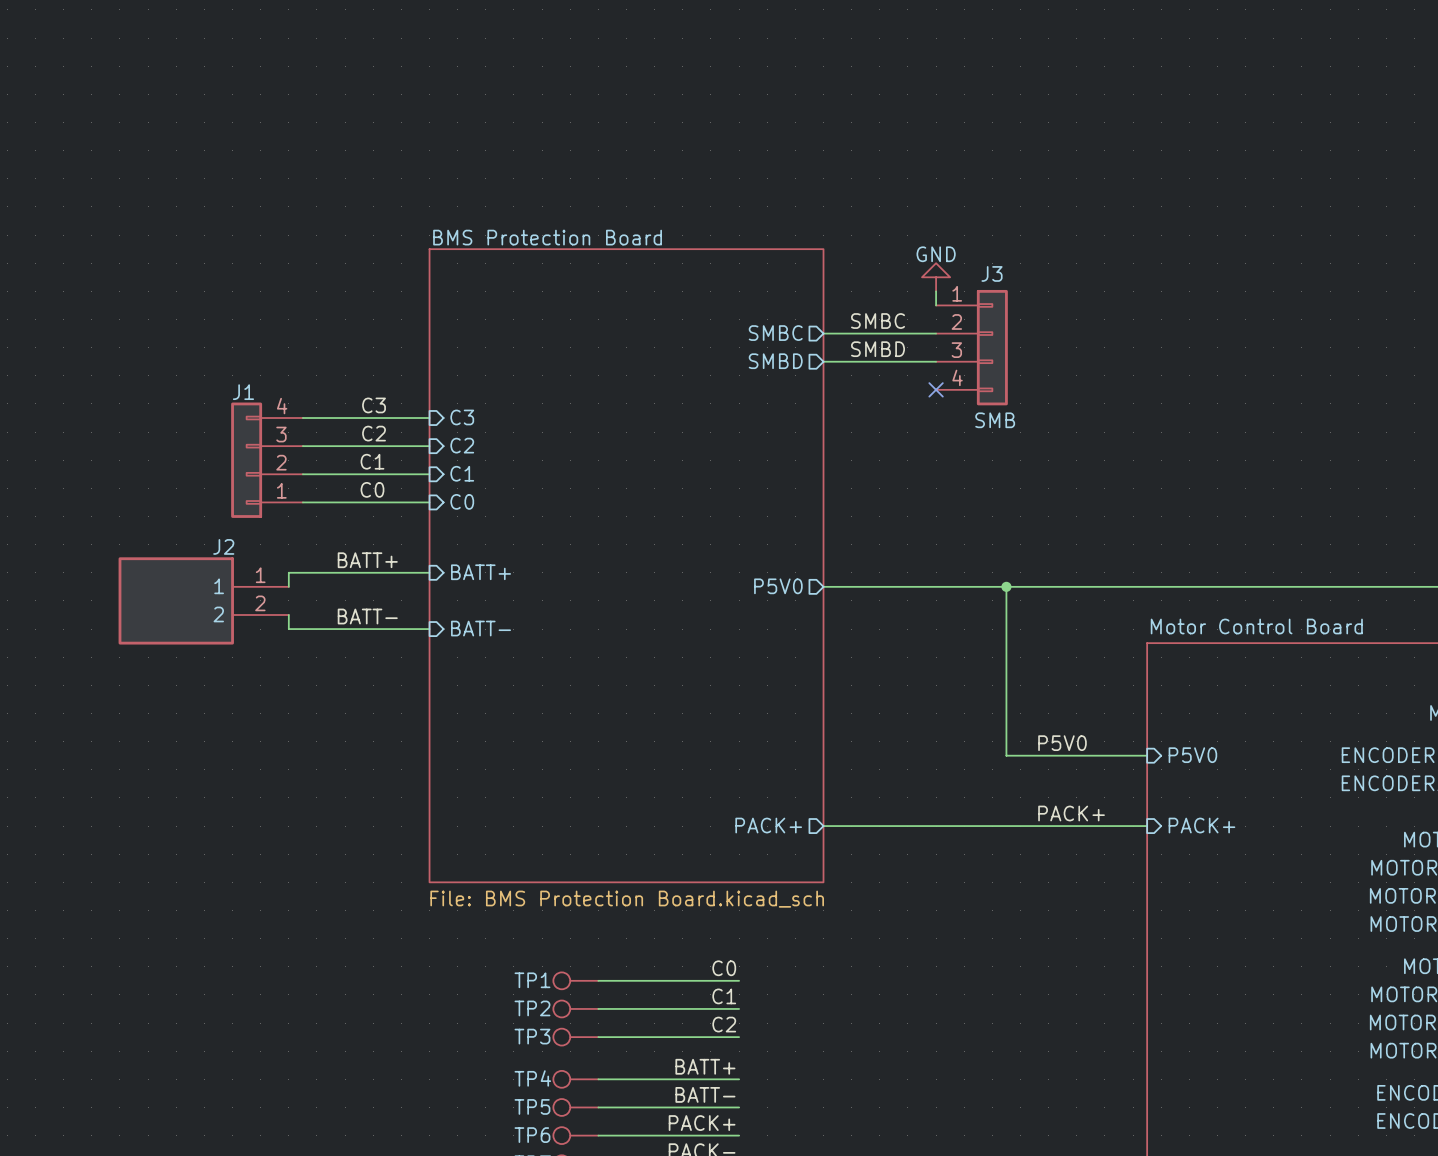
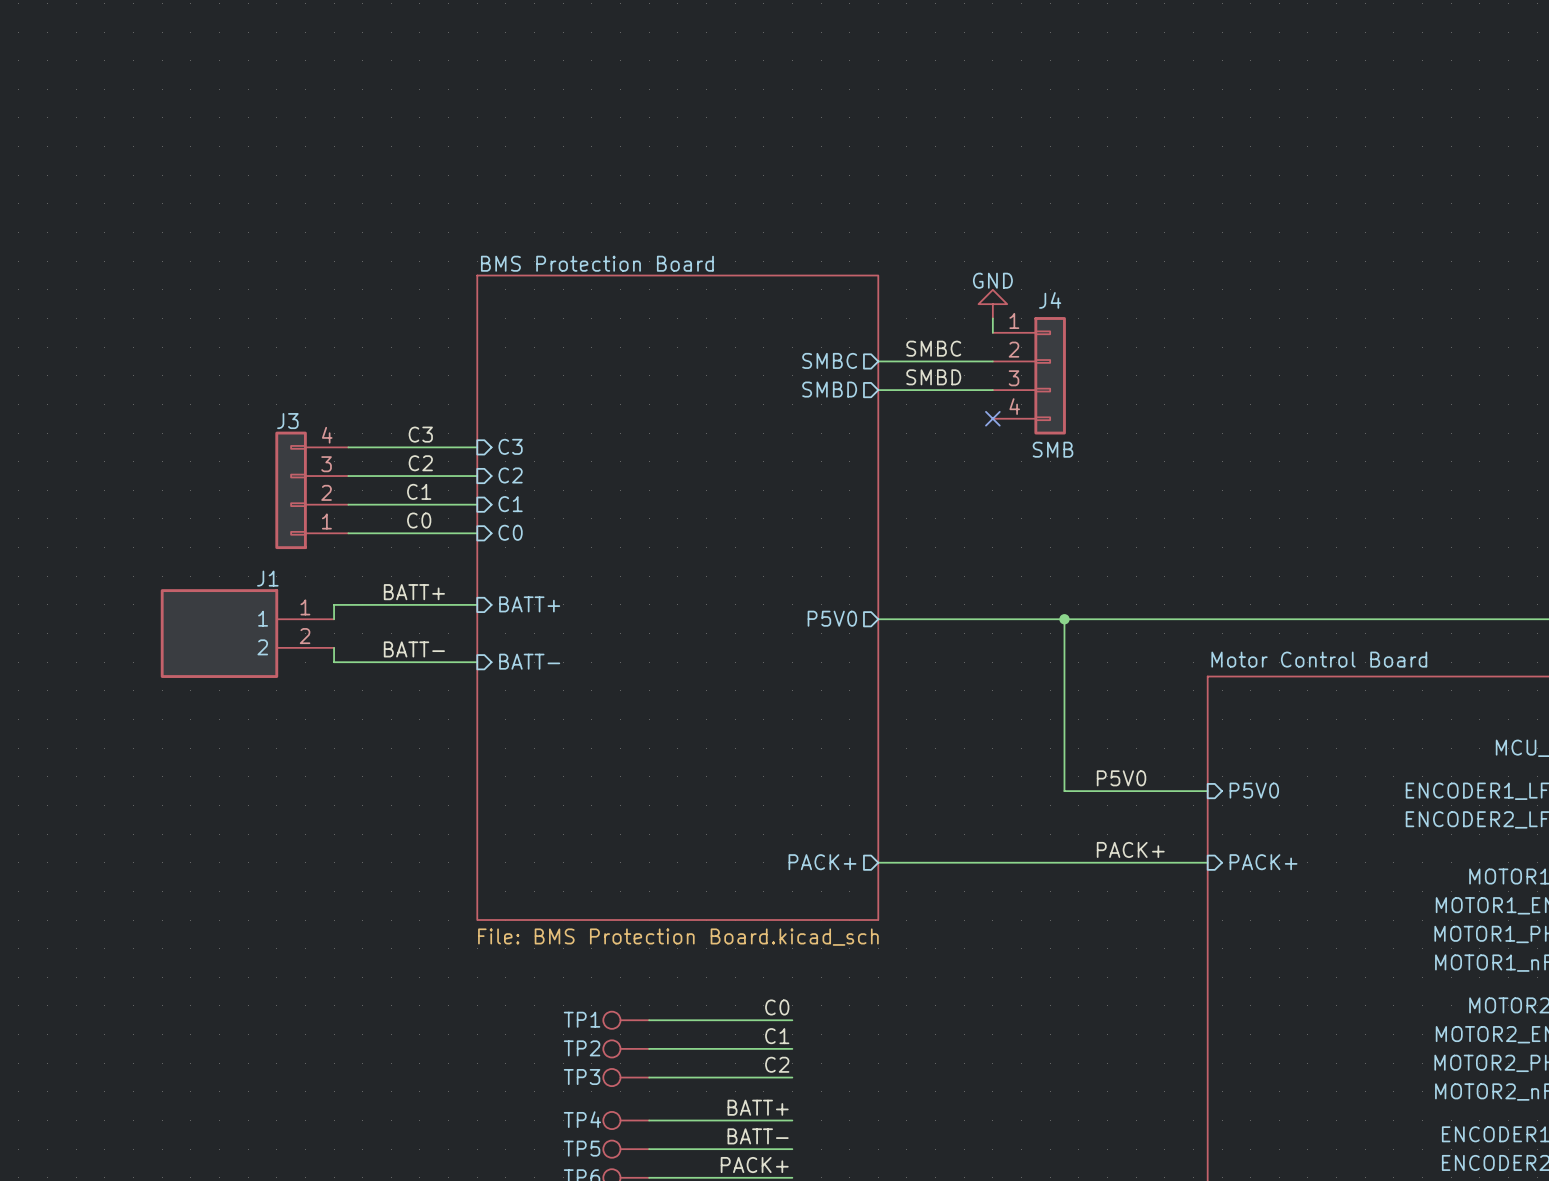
J3 name: J3 (992, 273) -> J4 (1050, 300)
J1 name: J1 (243, 392) -> J3 (287, 421)
J2 name: J2 (223, 546) -> J1 (267, 578)

